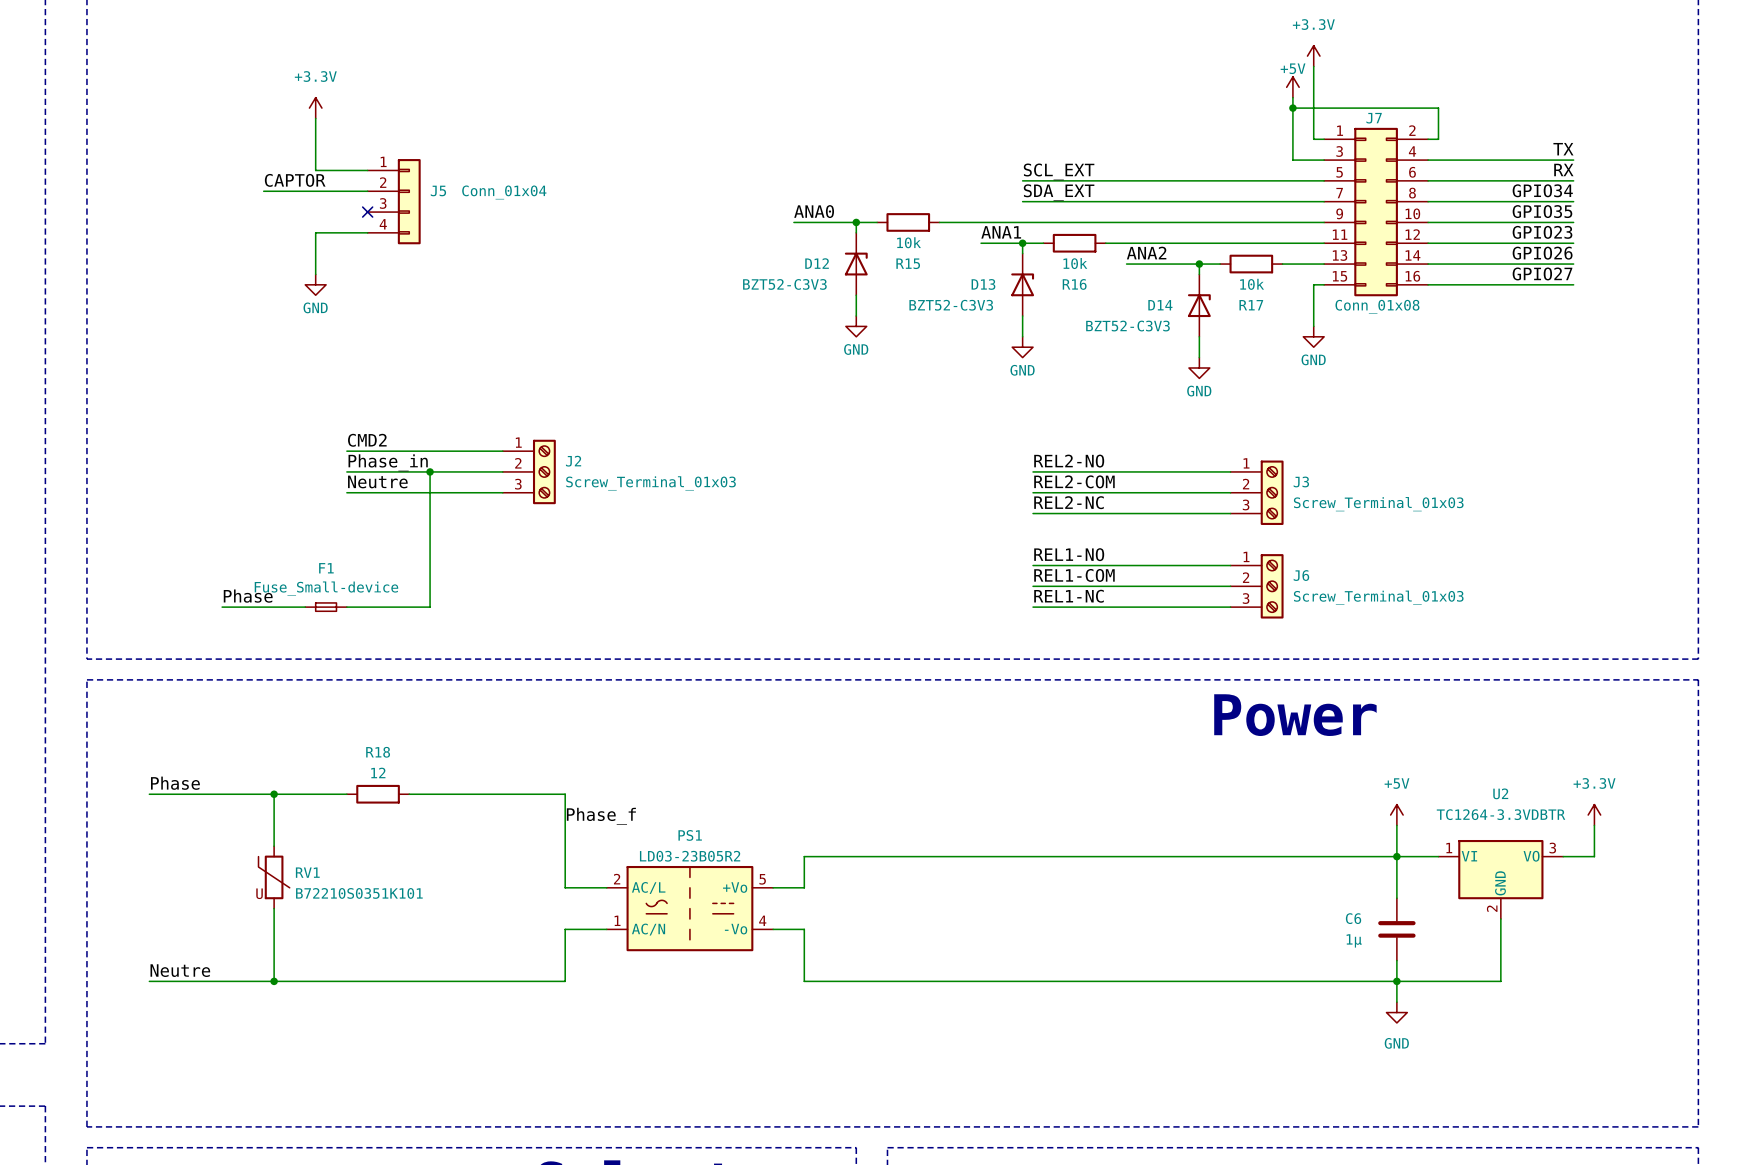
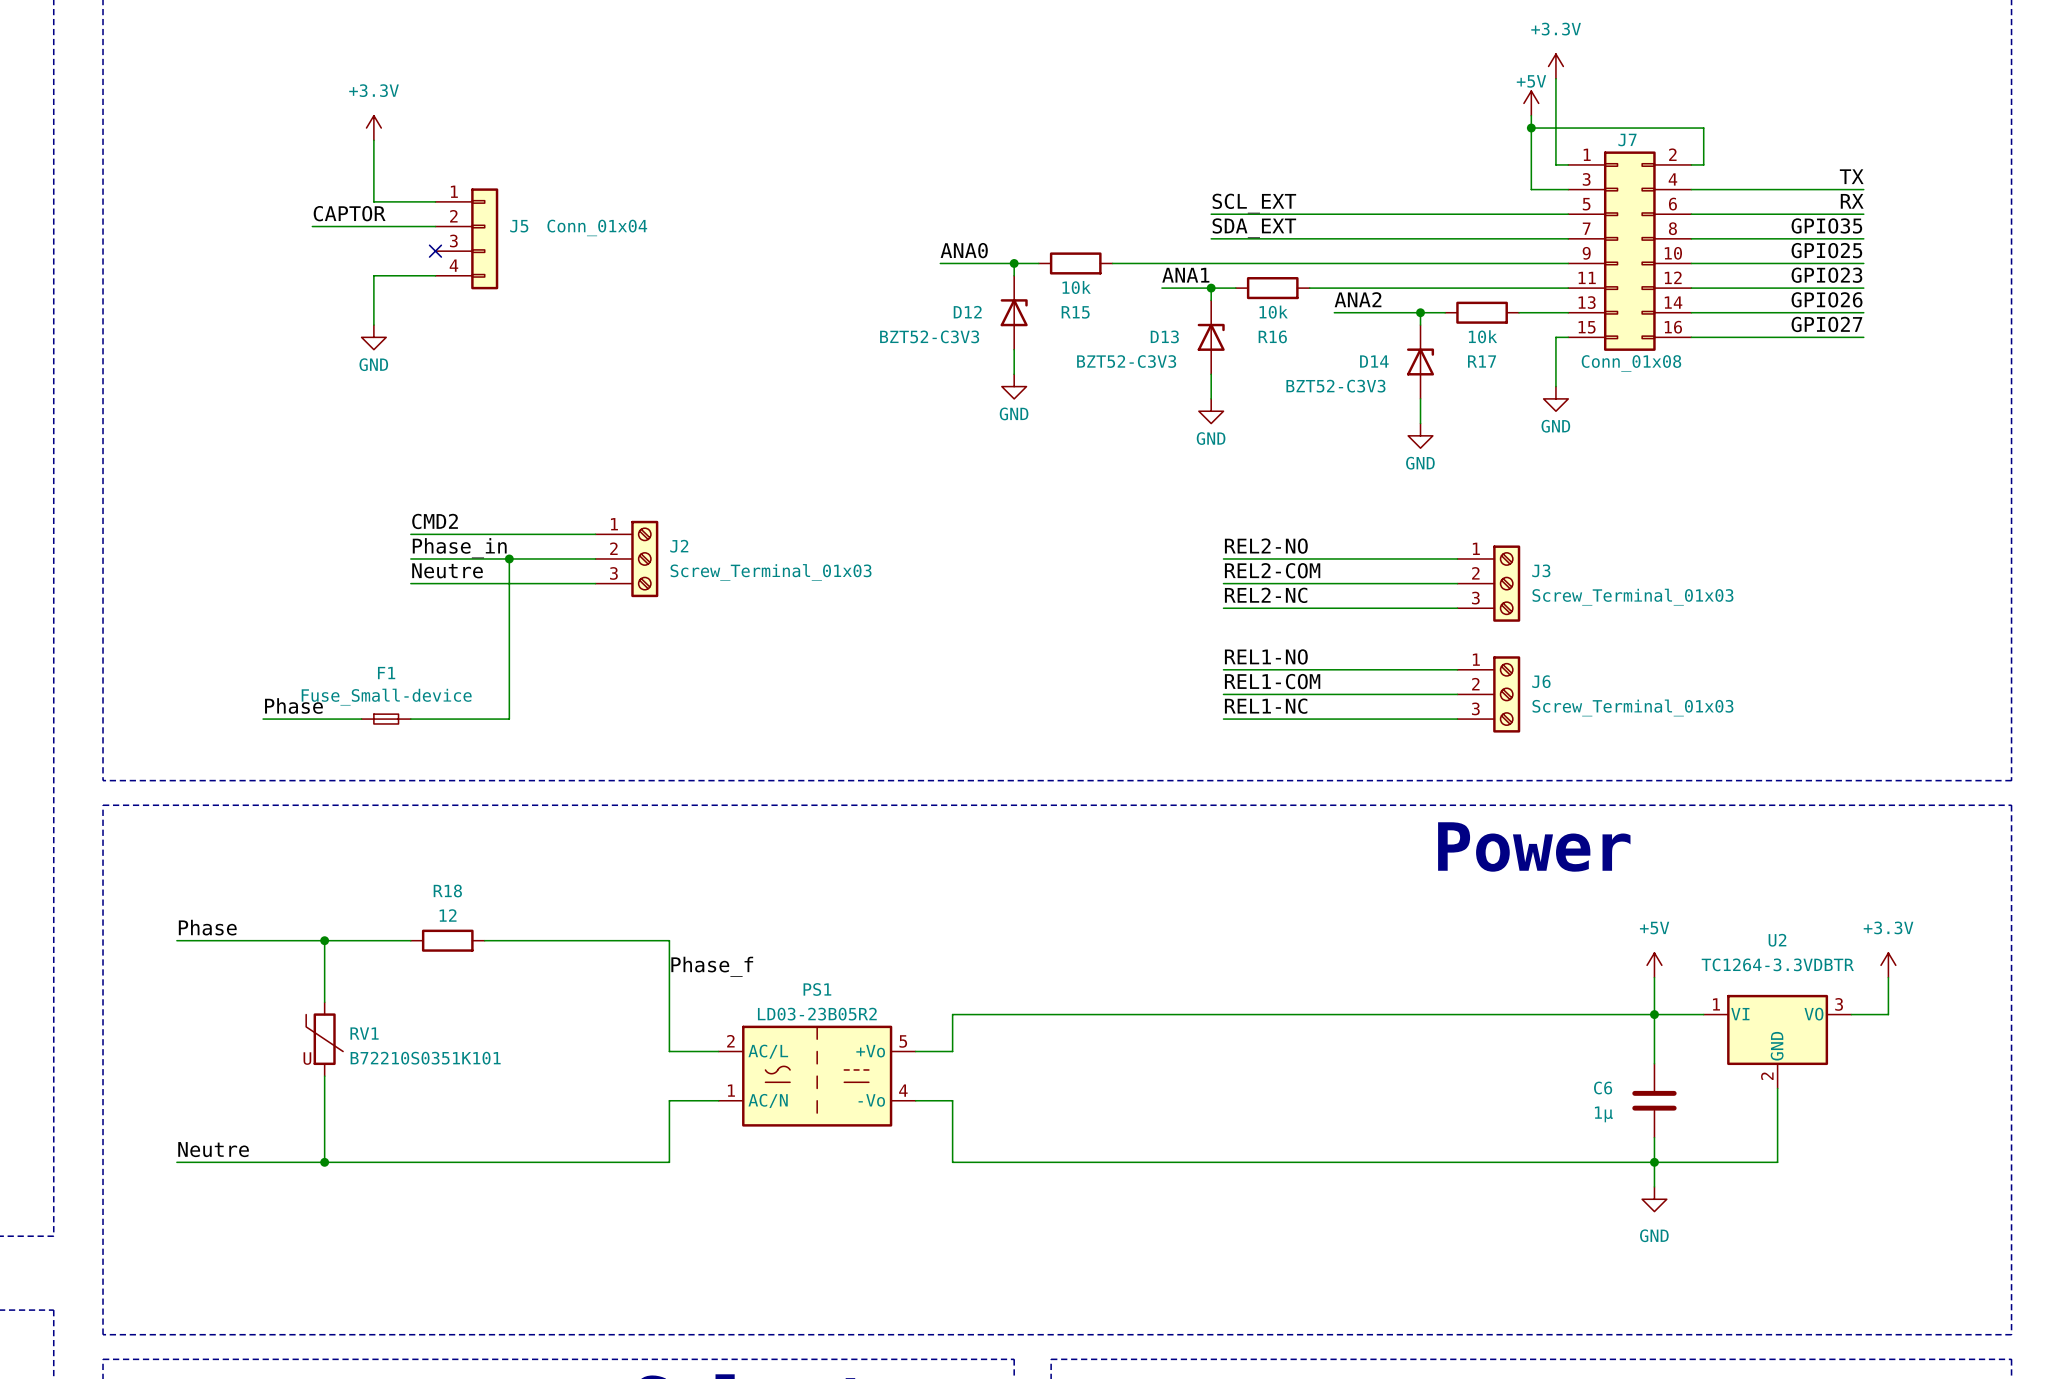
label: GPIO34 (1542, 190) -> GPIO35 (1826, 225)
label: GPIO35 (1542, 211) -> GPIO25 (1826, 250)

